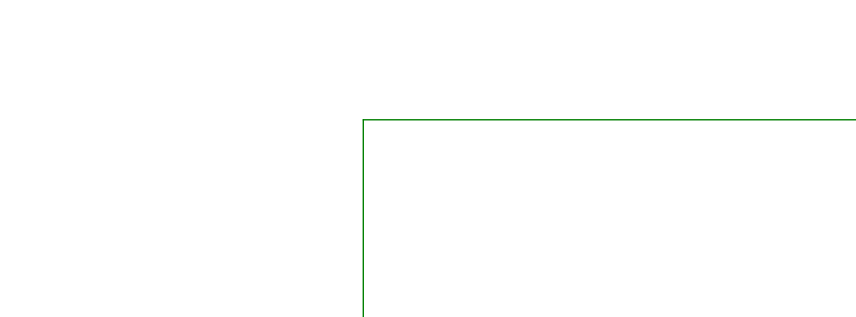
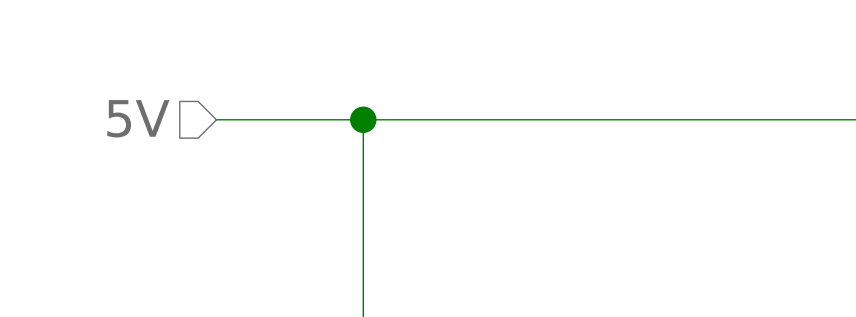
hierarchical label: none -> 5V (138, 118)
wire: none -> (216, 119) (363, 119)
junction: none -> (363, 119)

